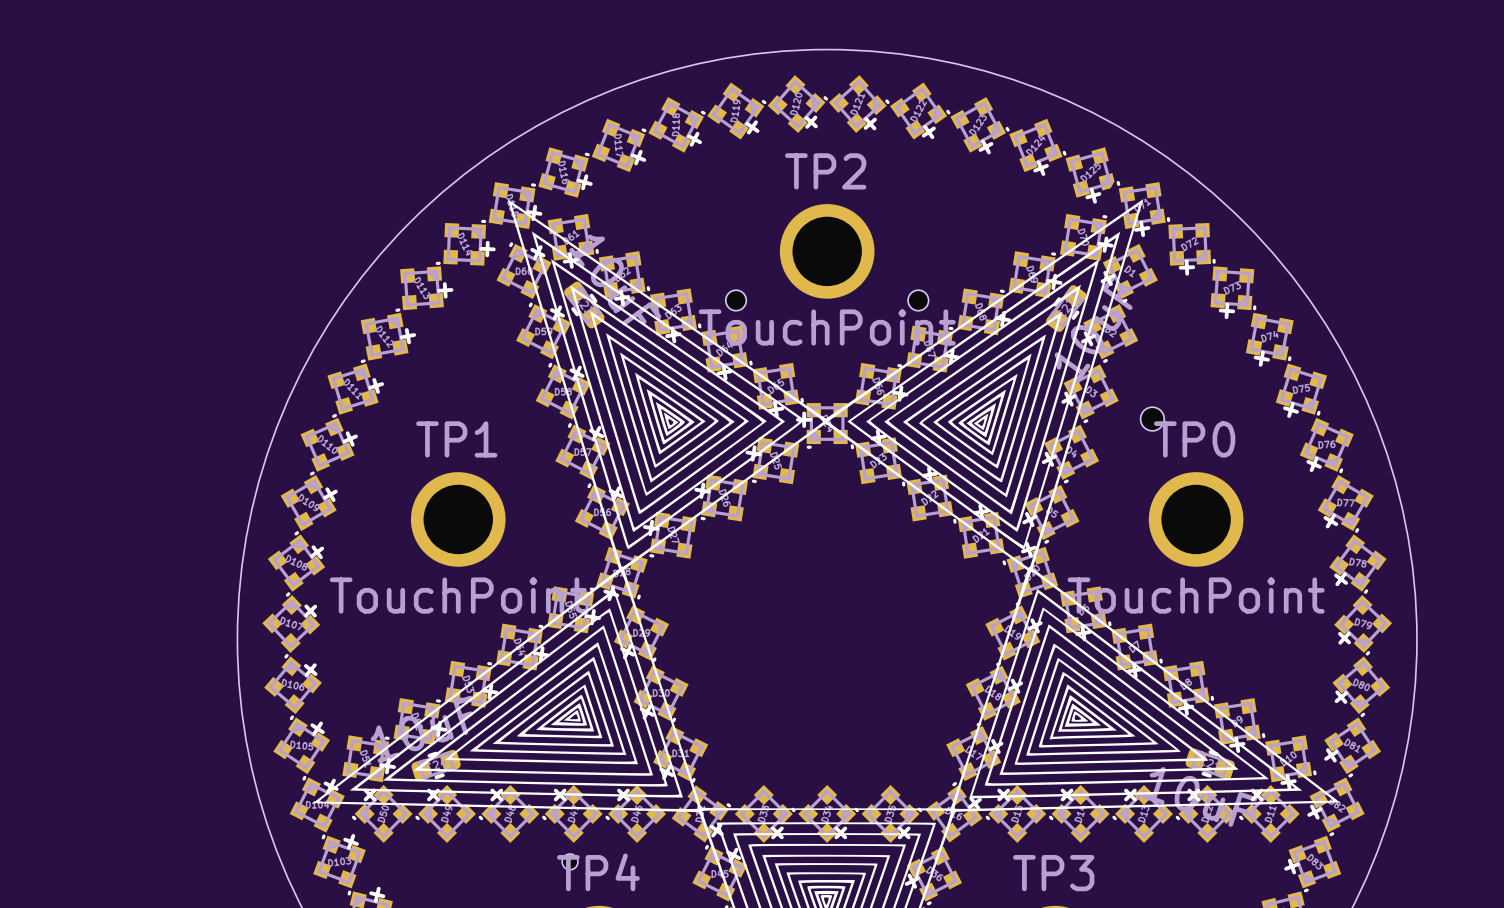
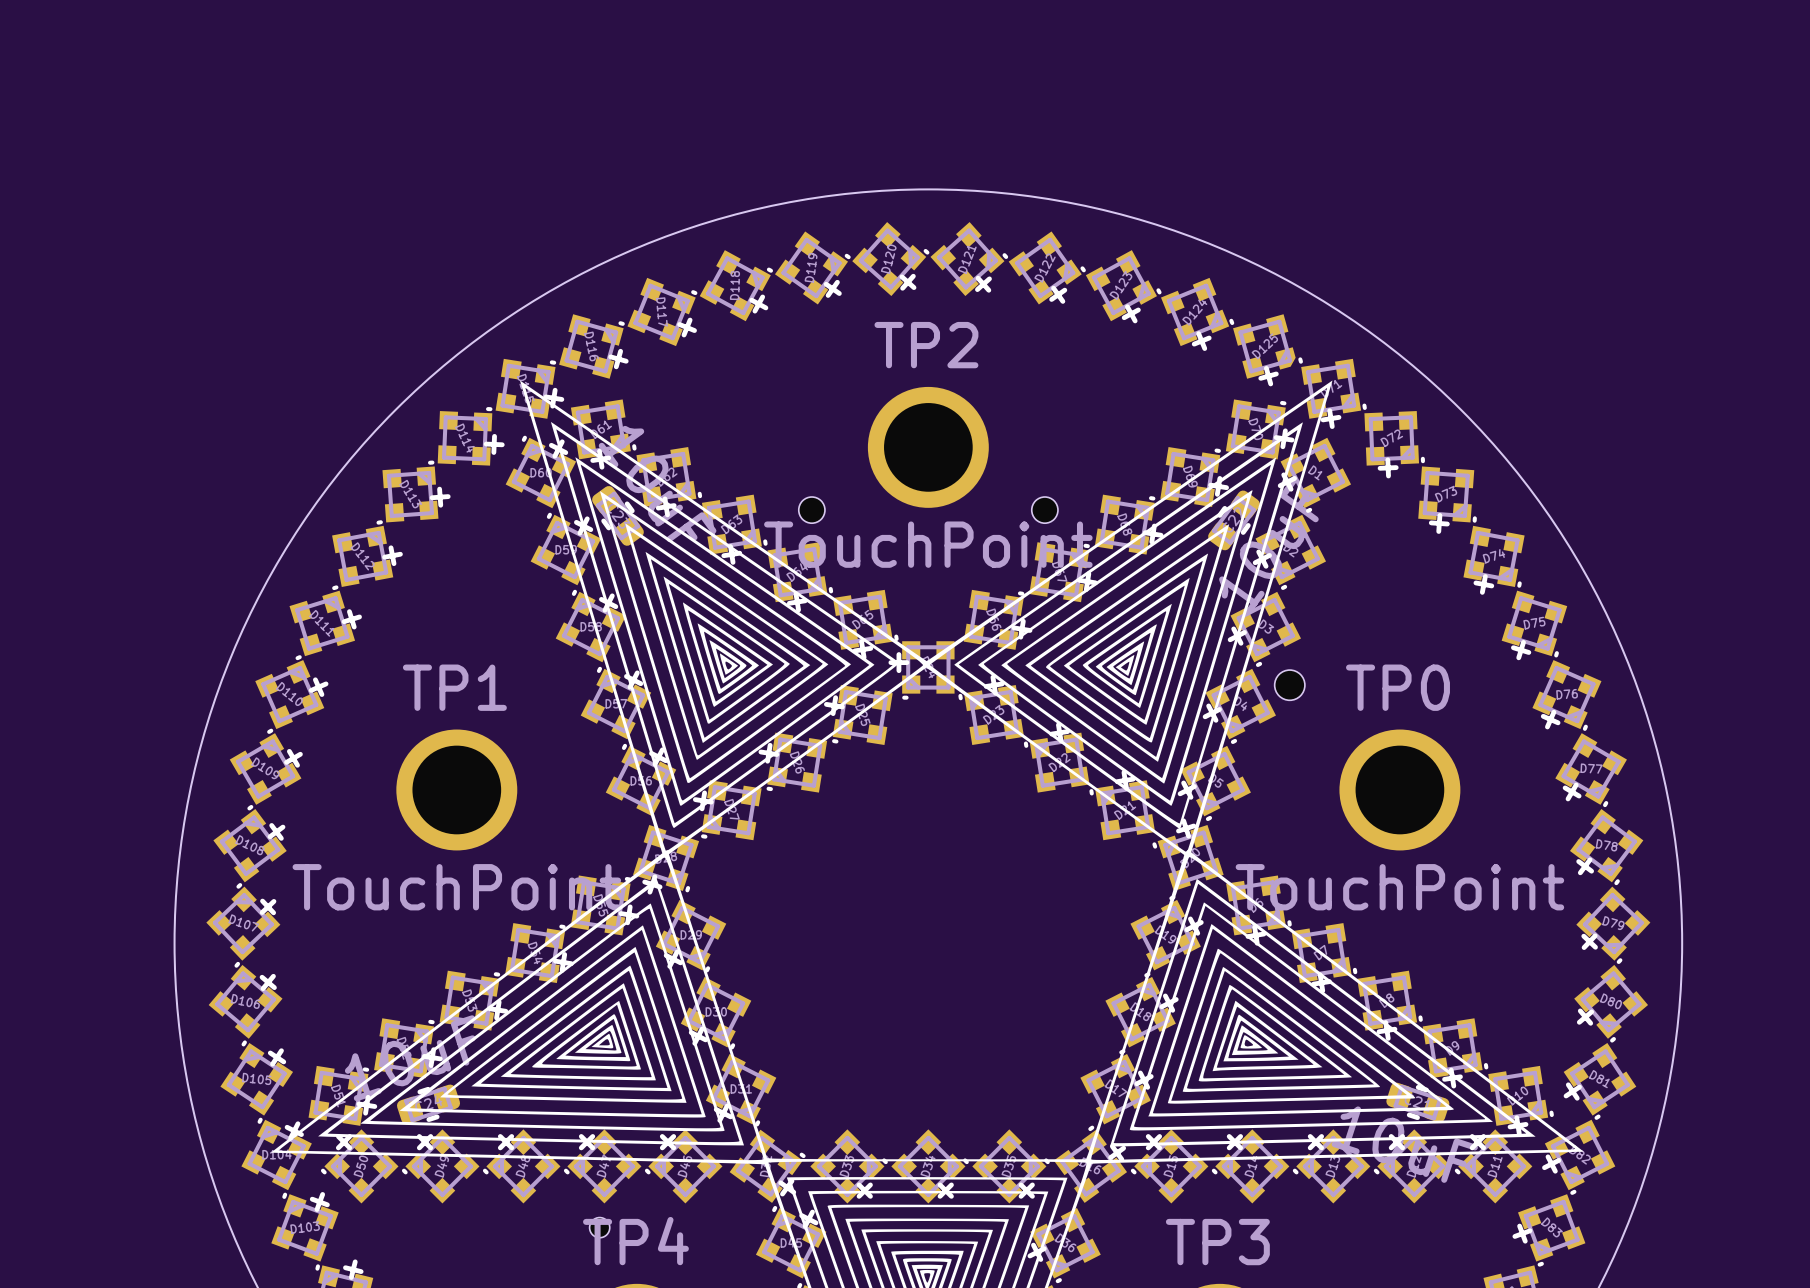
part position: (1152, 419) -> (1289, 685)

